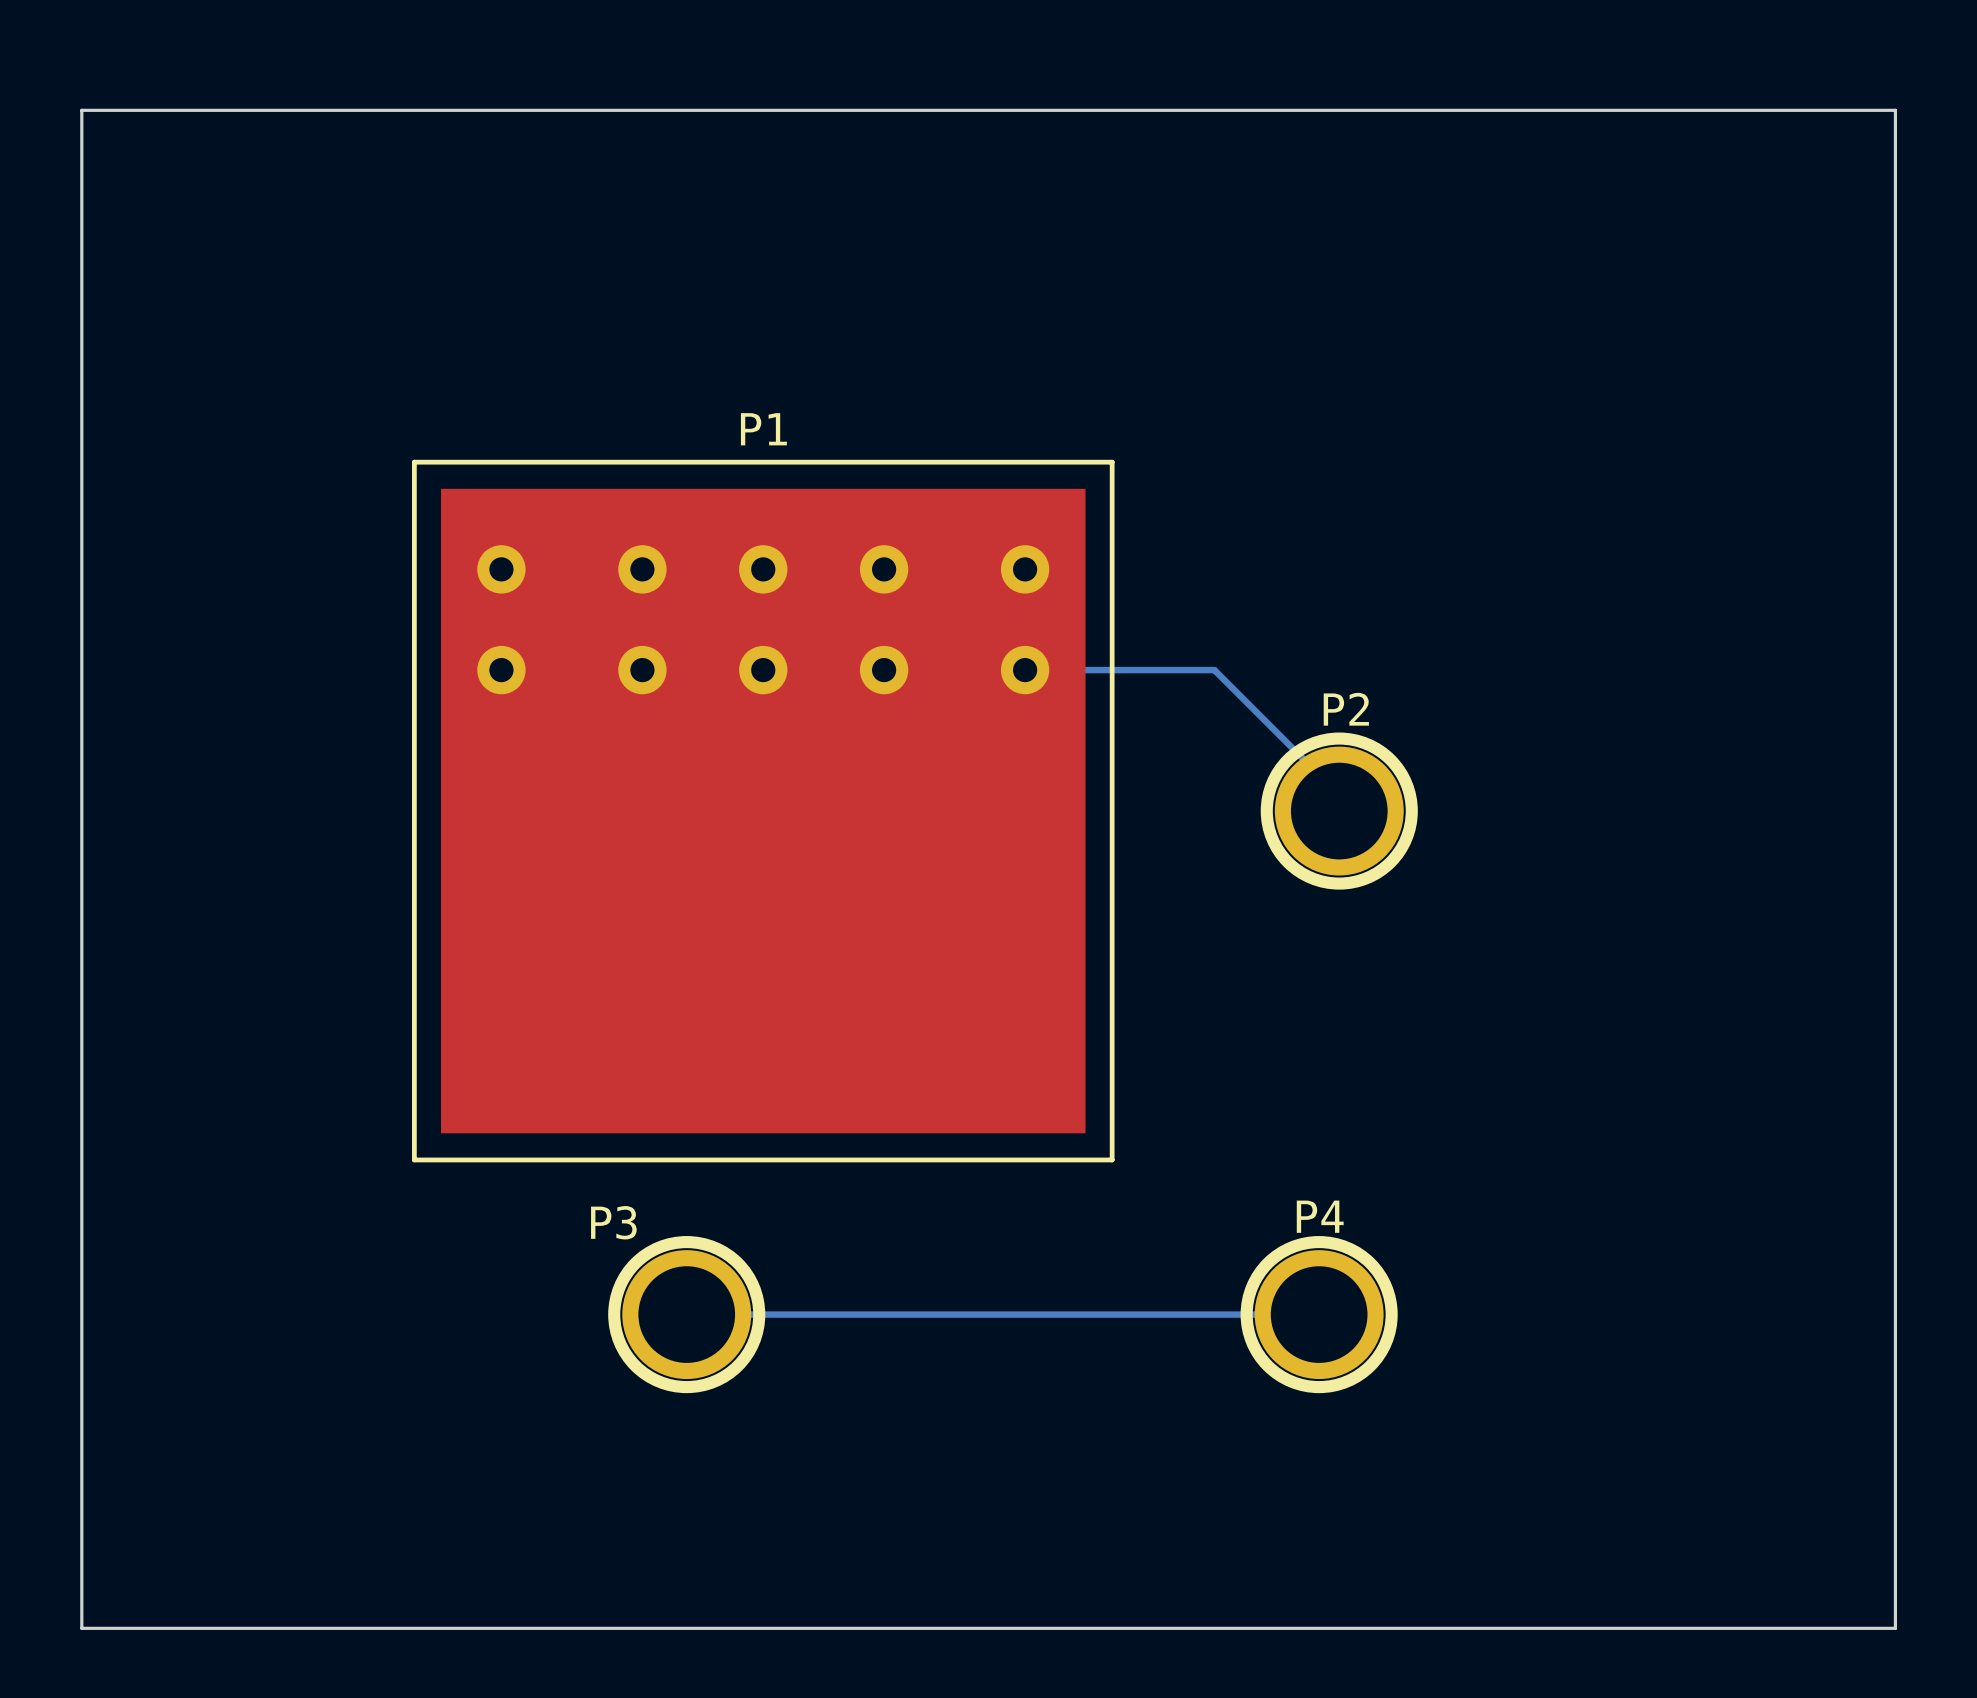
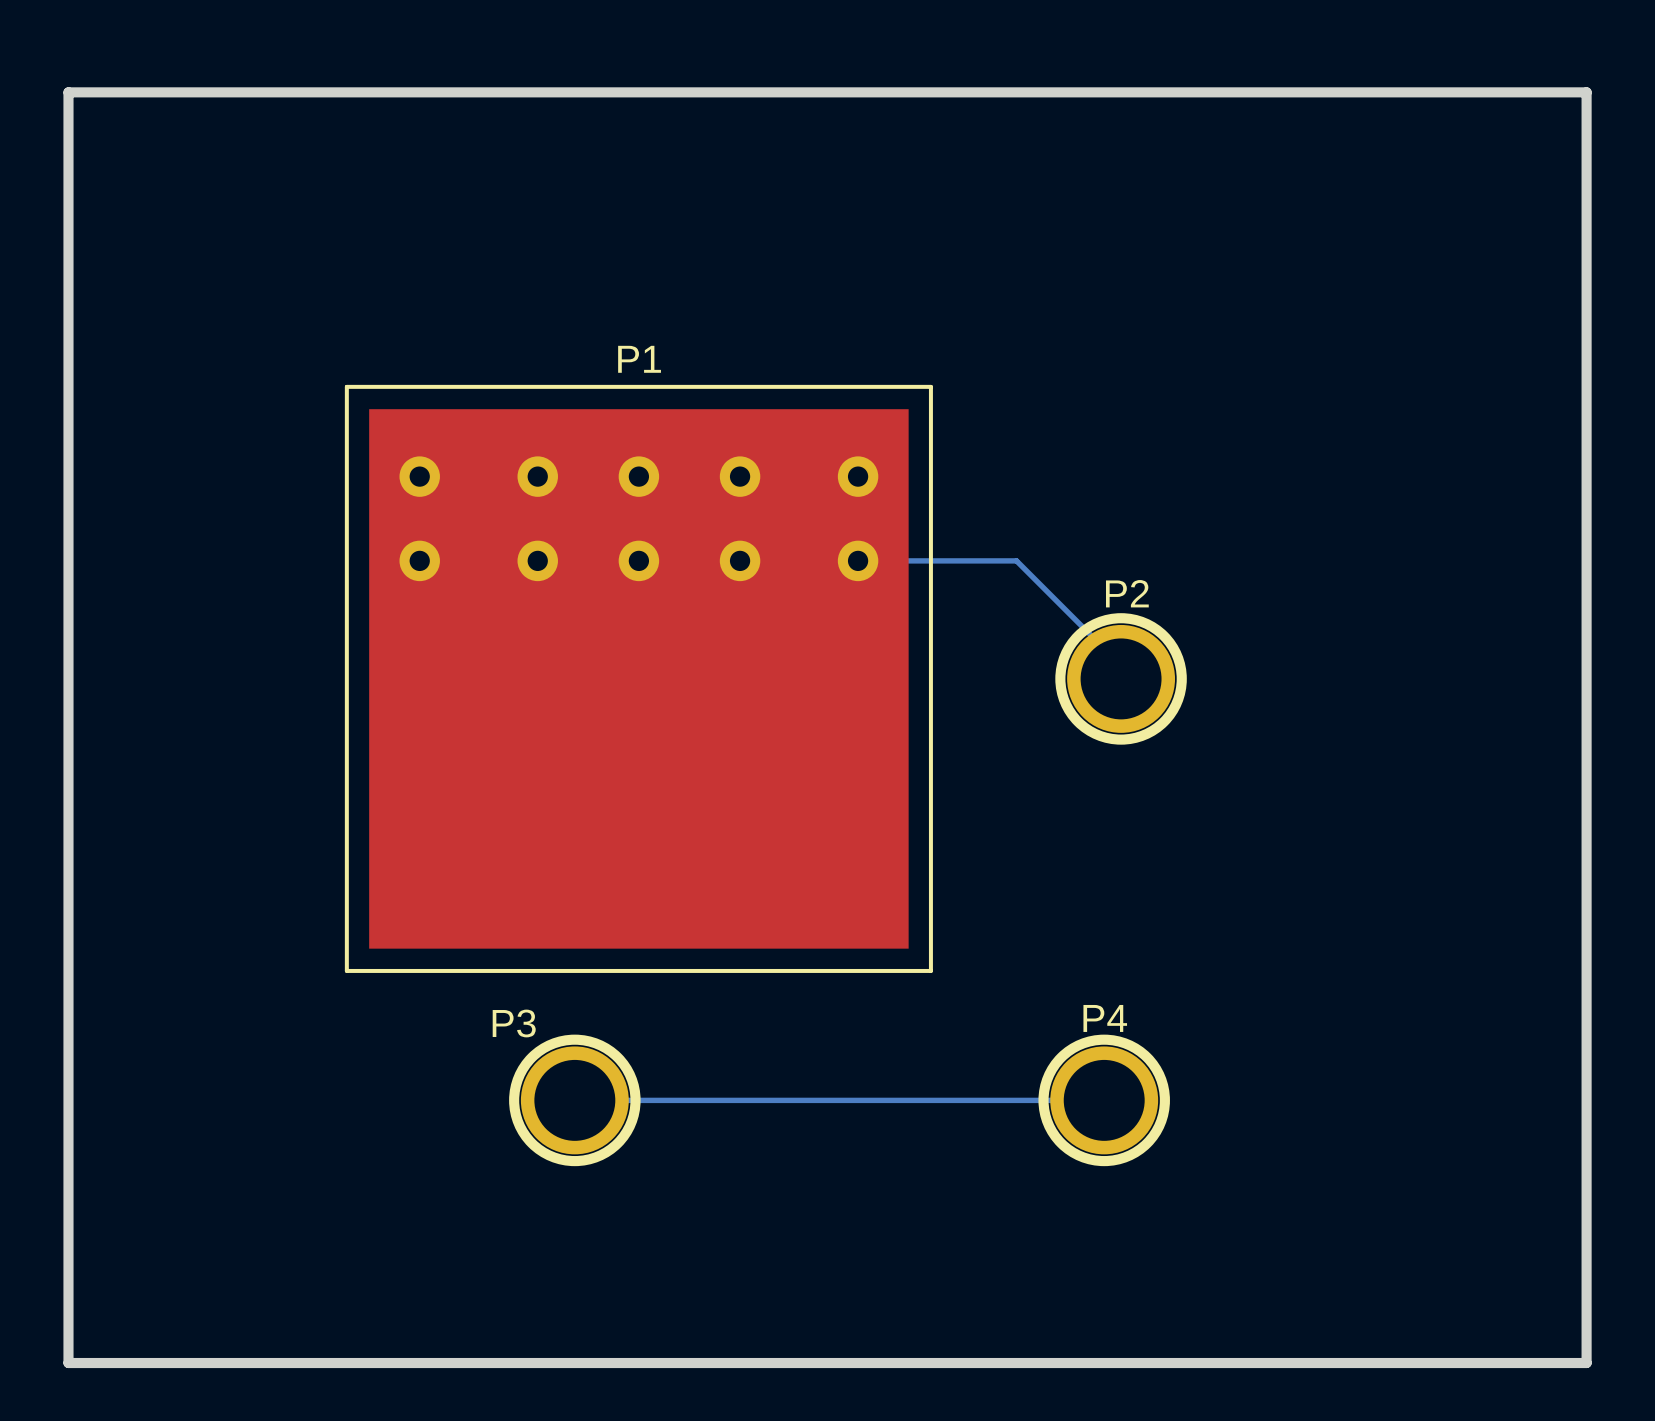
board edge width: thin (81, 110) (1895, 110) (1895, 1628) (81, 1628) (81, 110) -> thick (68, 92) (1586, 92) (1586, 1363) (68, 1363) (68, 92)

